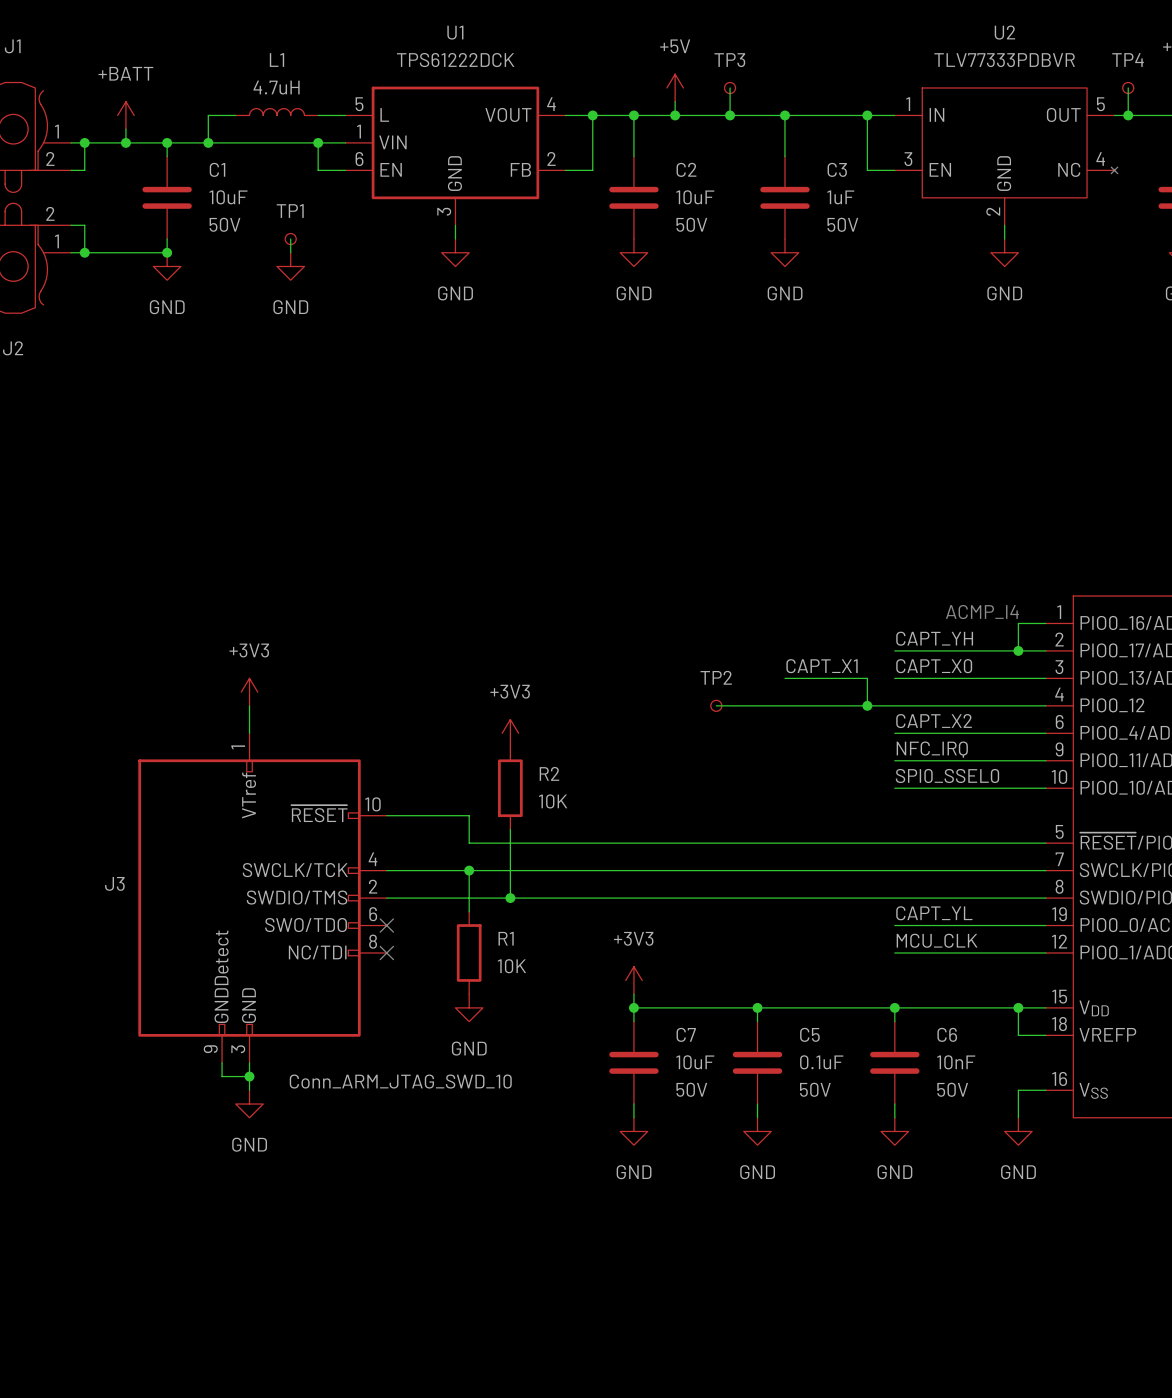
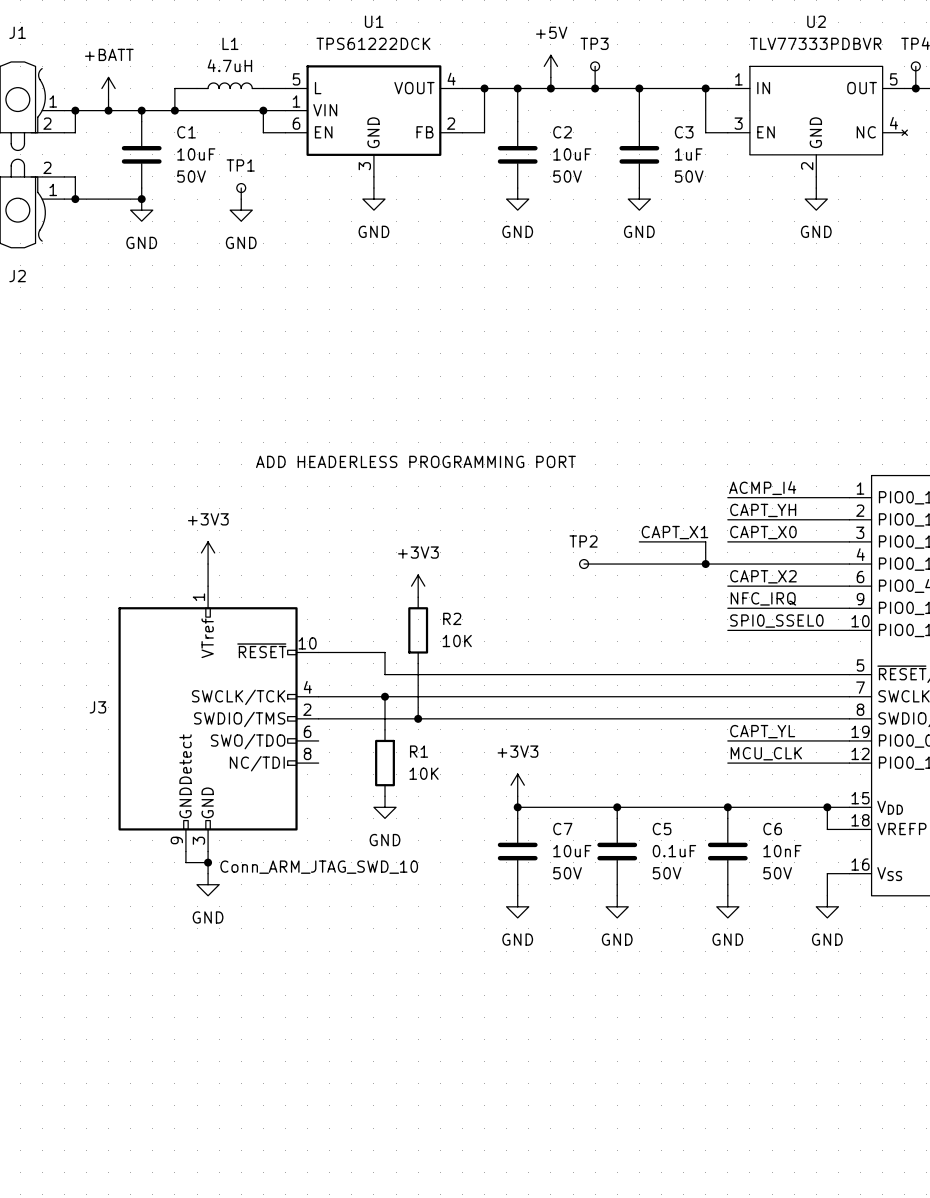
text: none -> ADD HEADERLESS PROGRAMMING PORT (415, 461)
label: none -> ACMP_I4 (762, 488)
text: ACMP_I4 (982, 612) -> none
wire: (1018, 623) (1018, 650) -> (827, 497) (727, 497)
junction: (1018, 650) -> none
no-connect mark: (386, 925) -> none
no-connect mark: (386, 952) -> none

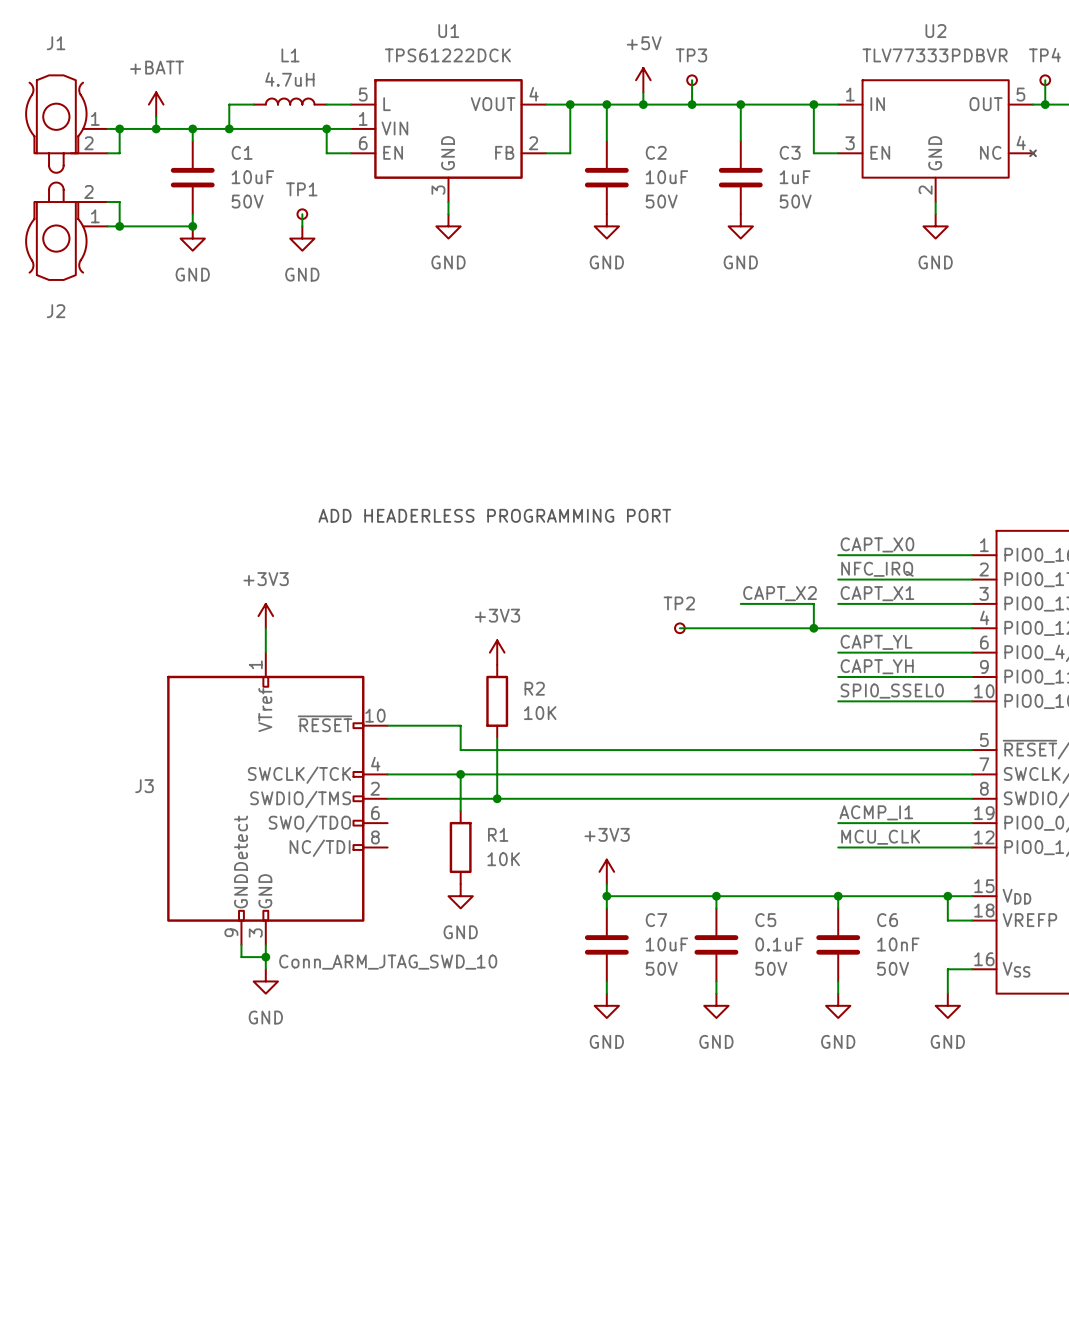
label: ACMP_I4 (762, 488) -> CAPT_X0 (877, 544)
label: CAPT_YH (763, 510) -> NFC_IRQ (877, 569)
label: CAPT_X1 (674, 532) -> CAPT_X2 (780, 593)
label: CAPT_X0 (763, 532) -> CAPT_X1 (877, 593)
label: CAPT_X2 (763, 576) -> CAPT_YL (876, 642)
label: NFC_IRQ (763, 598) -> CAPT_YH (877, 666)
label: CAPT_YL (762, 731) -> ACMP_I1 (876, 812)

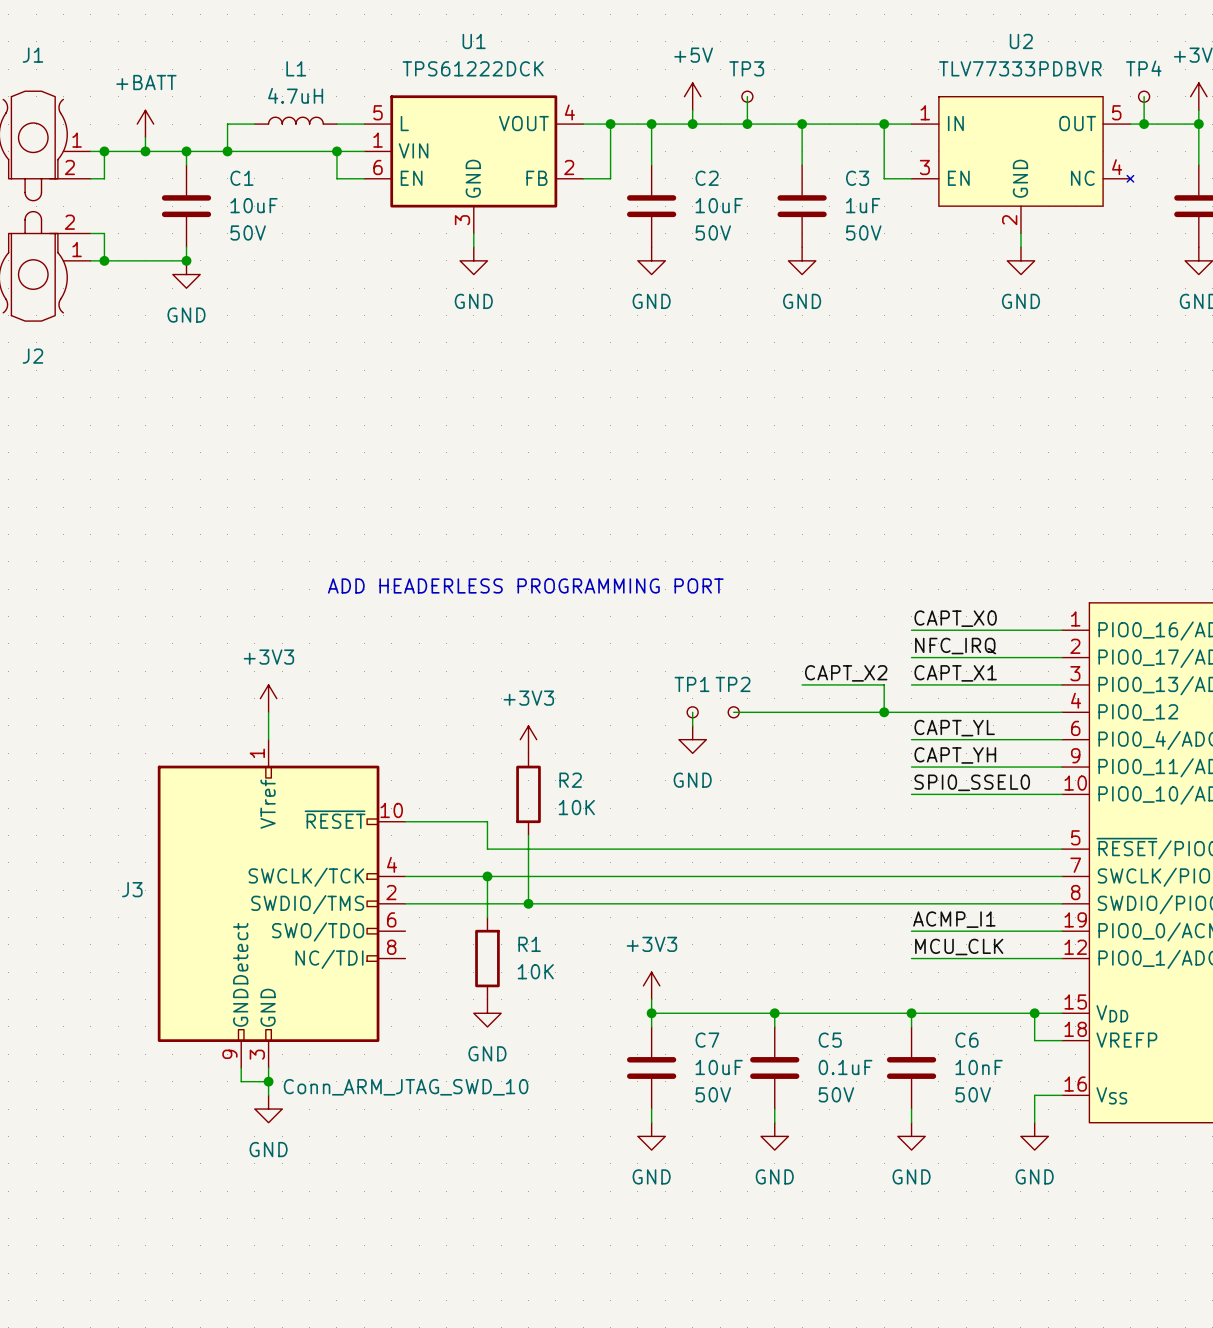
wire: (302, 214) (302, 226) -> none
TP1 position: (302, 214) -> (692, 712)
power symbol: GND (302, 238) -> none
wire: none -> (692, 712) (692, 725)
power symbol: none -> GND (692, 739)

